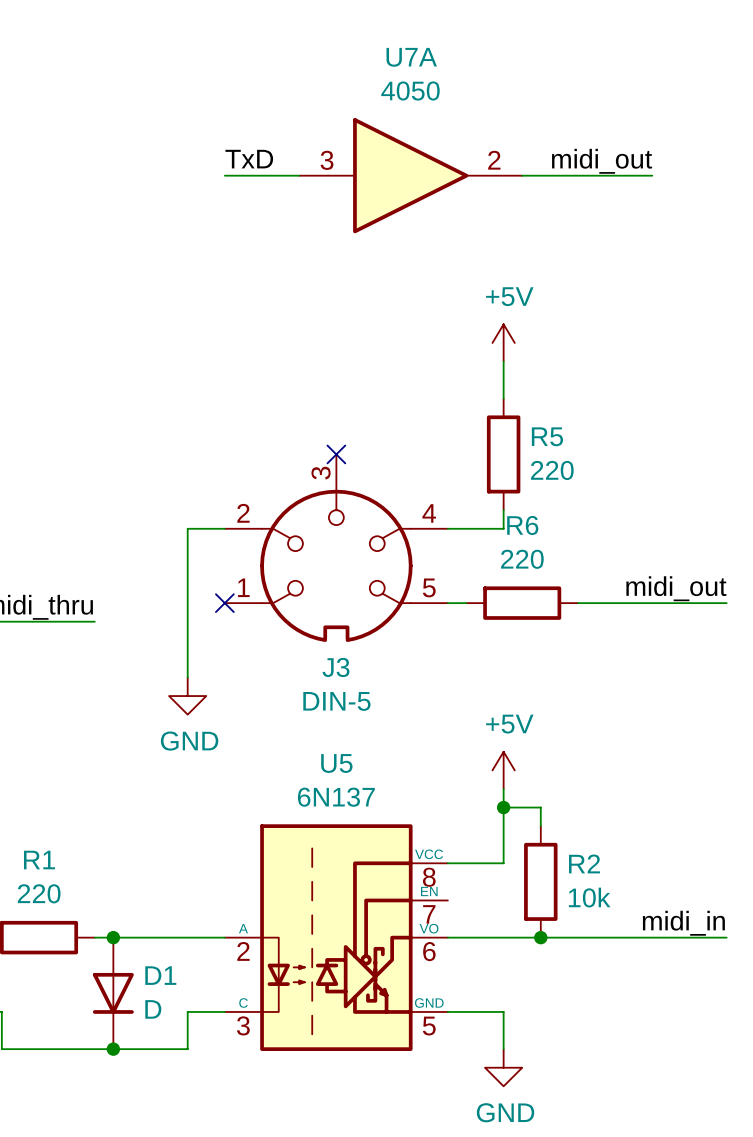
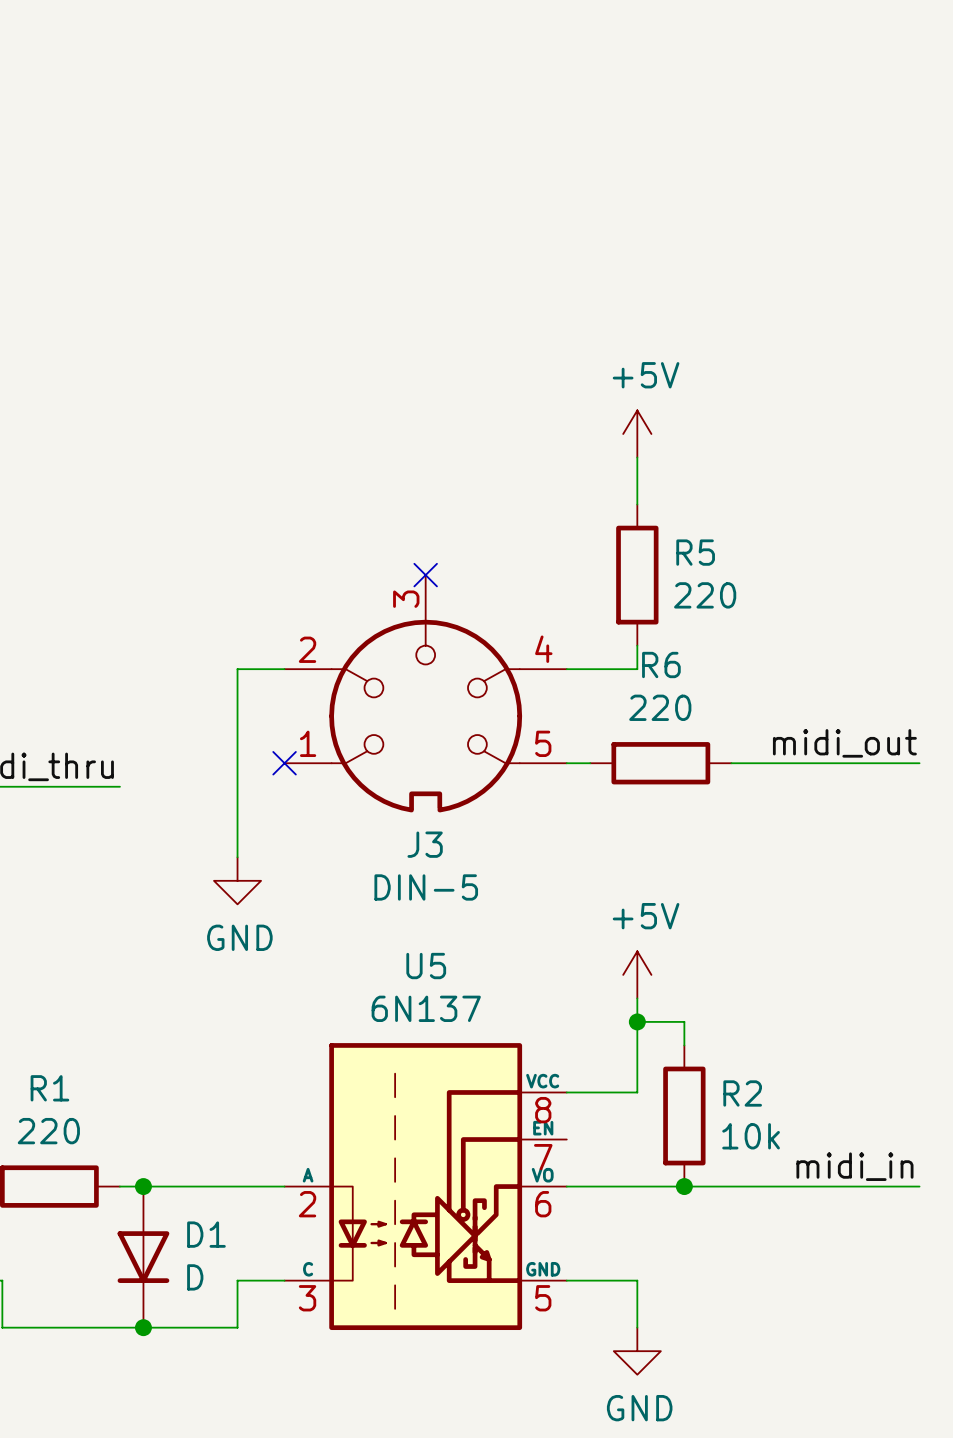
label: TxD (249, 159) -> none
label: midi_out (602, 161) -> none
wire: (224, 175) (299, 175) -> none
U7A: 4050 (410, 175) -> none
wire: (522, 175) (652, 175) -> none

